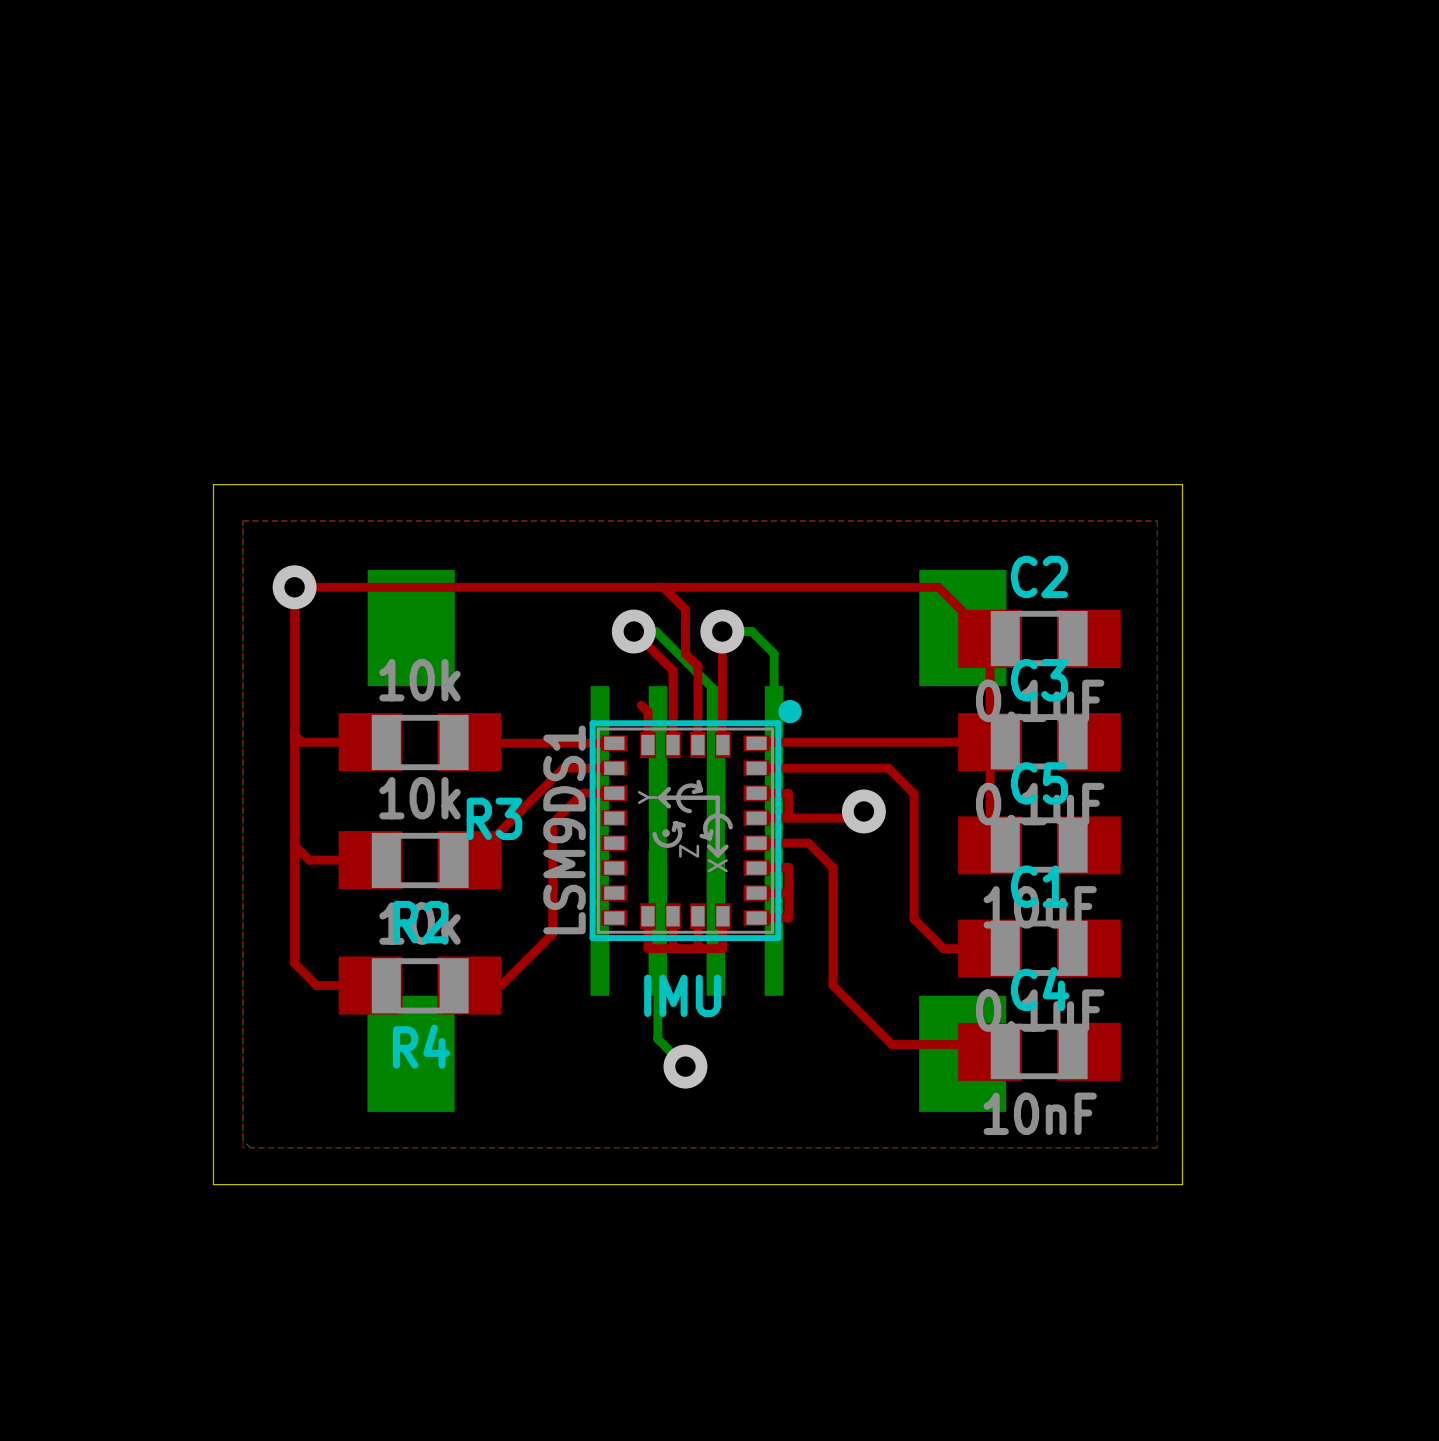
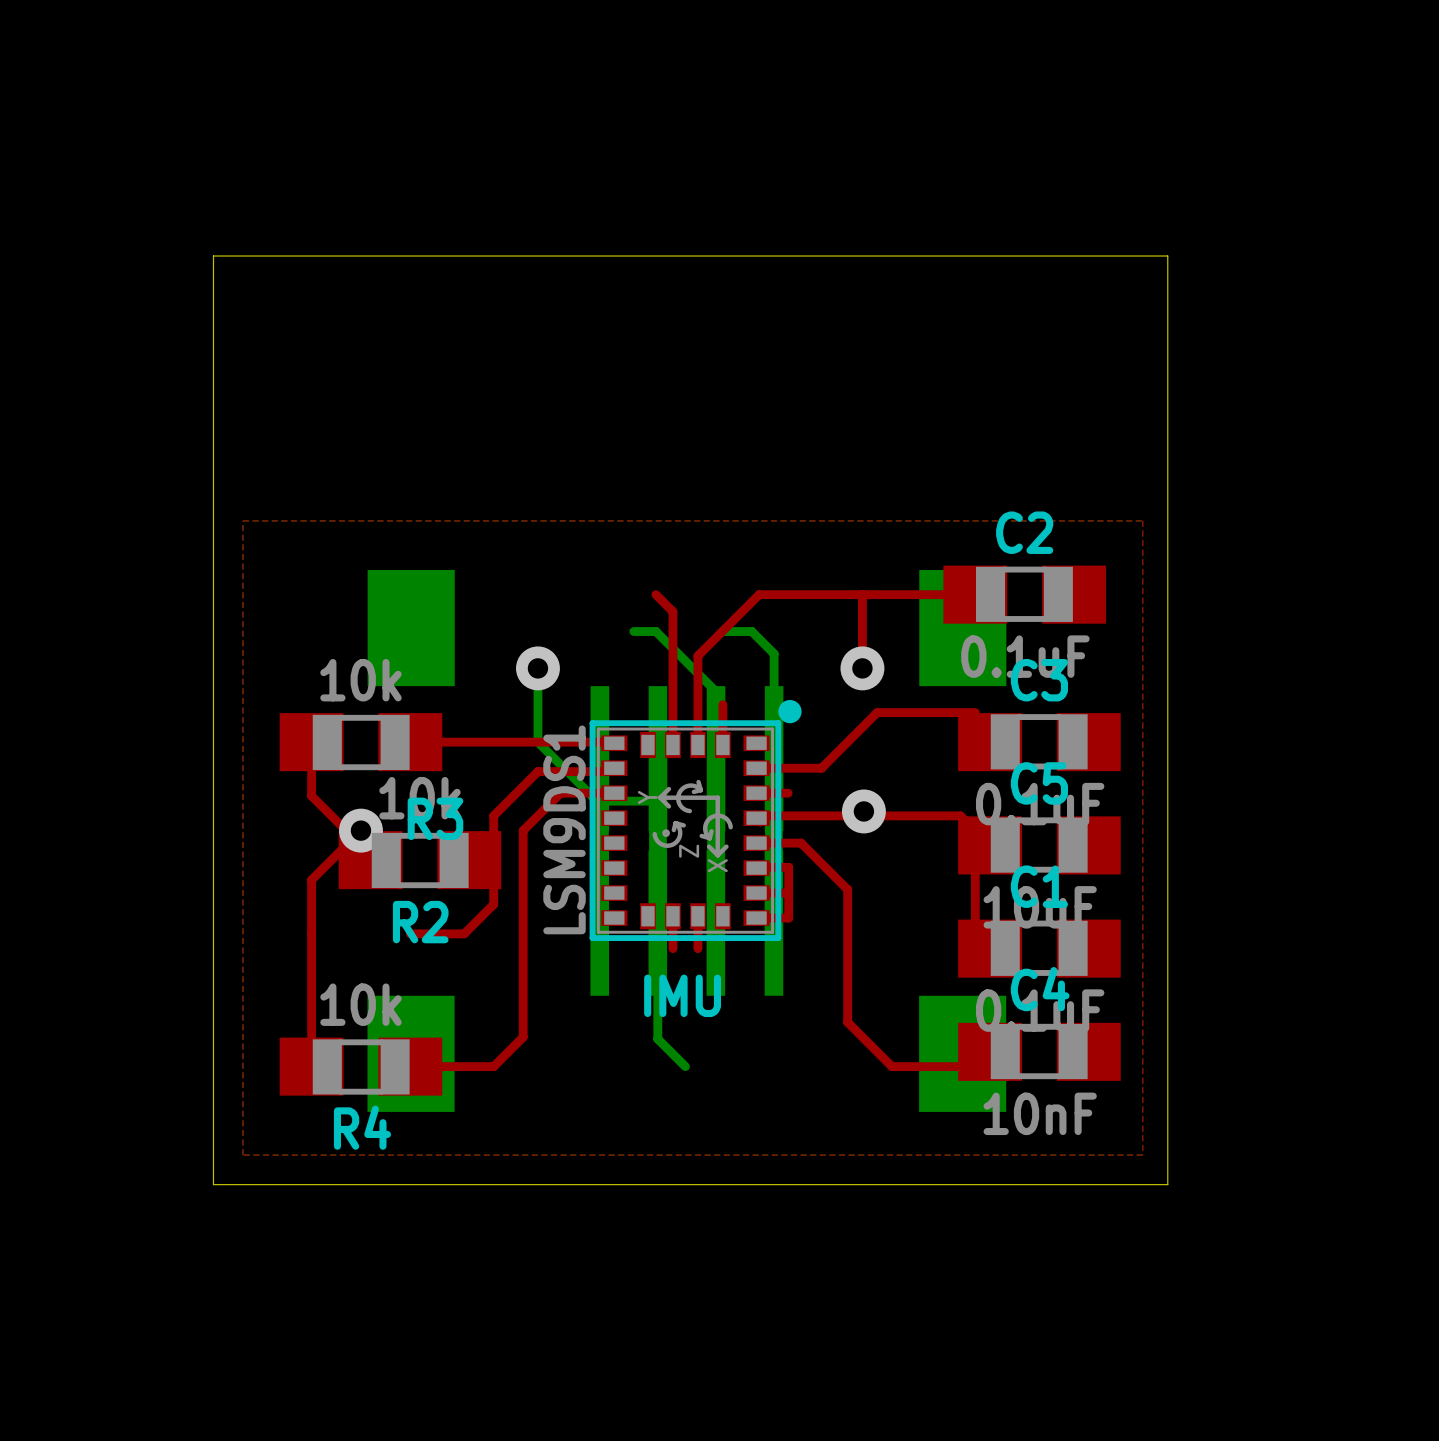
board edge: (213, 484) (1182, 484) (1182, 1184) (1167, 1184) -> (213, 484) (213, 256) (1167, 256) (1167, 1184)
top zone outline: (1142, 520) (1157, 520) (1157, 1147) (242, 1147) -> (1142, 520) (1142, 1155) (242, 1155) (242, 1147)
via: (294, 587) -> none
top track: (663, 587) (685, 609) (685, 653) (697, 666) -> (975, 594) (759, 594) (697, 655) (697, 666)
top track: none -> (862, 594) (862, 668)
top track: (633, 631) (672, 670) -> (655, 594) (672, 611) (672, 670)
via: (633, 631) -> none
top track: (722, 631) (722, 744) -> (722, 704) (722, 744)
via: (722, 631) -> none
C2 position: (1039, 638) -> (1024, 594)
bottom track: none -> (537, 668) (537, 742) (596, 801) (655, 801)
via: none -> (537, 668)
via: none -> (862, 668)
top track: (641, 705) (648, 712) (648, 744) -> none
top track: (294, 734) (301, 742) (370, 742) -> none
top track: none -> (311, 742) (311, 796) (346, 830) (360, 830) (311, 880) (311, 1066)
R3 position: (419, 742) -> (360, 742)
top track: (469, 742) (614, 743) -> (410, 742) (614, 743)
top track: (990, 742) (756, 743) -> none
top track: (614, 768) (563, 768) (471, 860) (469, 860) -> (614, 768) (610, 771) (537, 771) (493, 815) (493, 904) (464, 933) (410, 933)
top track: (821, 768) (888, 768) (914, 793) (914, 919) (943, 948) (990, 948) -> (821, 768) (877, 712) (975, 712)
top track: (582, 793) (552, 823) (552, 933) (501, 985) (469, 985) -> (582, 793) (560, 793) (523, 830) (523, 1037) (493, 1066) (410, 1066)
top track: (788, 793) (788, 818) -> none
top track: (863, 811) (857, 818) (756, 818) -> (975, 948) (975, 830) (960, 815) (766, 815) (760, 822) (756, 818)
via: none -> (360, 830)
top track: (801, 843) (808, 843) (832, 867) (832, 985) (891, 1044) (982, 1044) (990, 1051) -> (801, 843) (847, 889) (847, 1022) (891, 1066) (975, 1066)
top track: (294, 845) (309, 860) (370, 860) -> none
top track: (990, 845) (990, 638) (938, 587) (294, 587) (294, 963) (316, 985) (370, 985) -> none
top track: (648, 916) (648, 948) (722, 948) (722, 916) -> none
R4 position: (419, 985) -> (360, 1066)
via: (685, 1066) -> none

